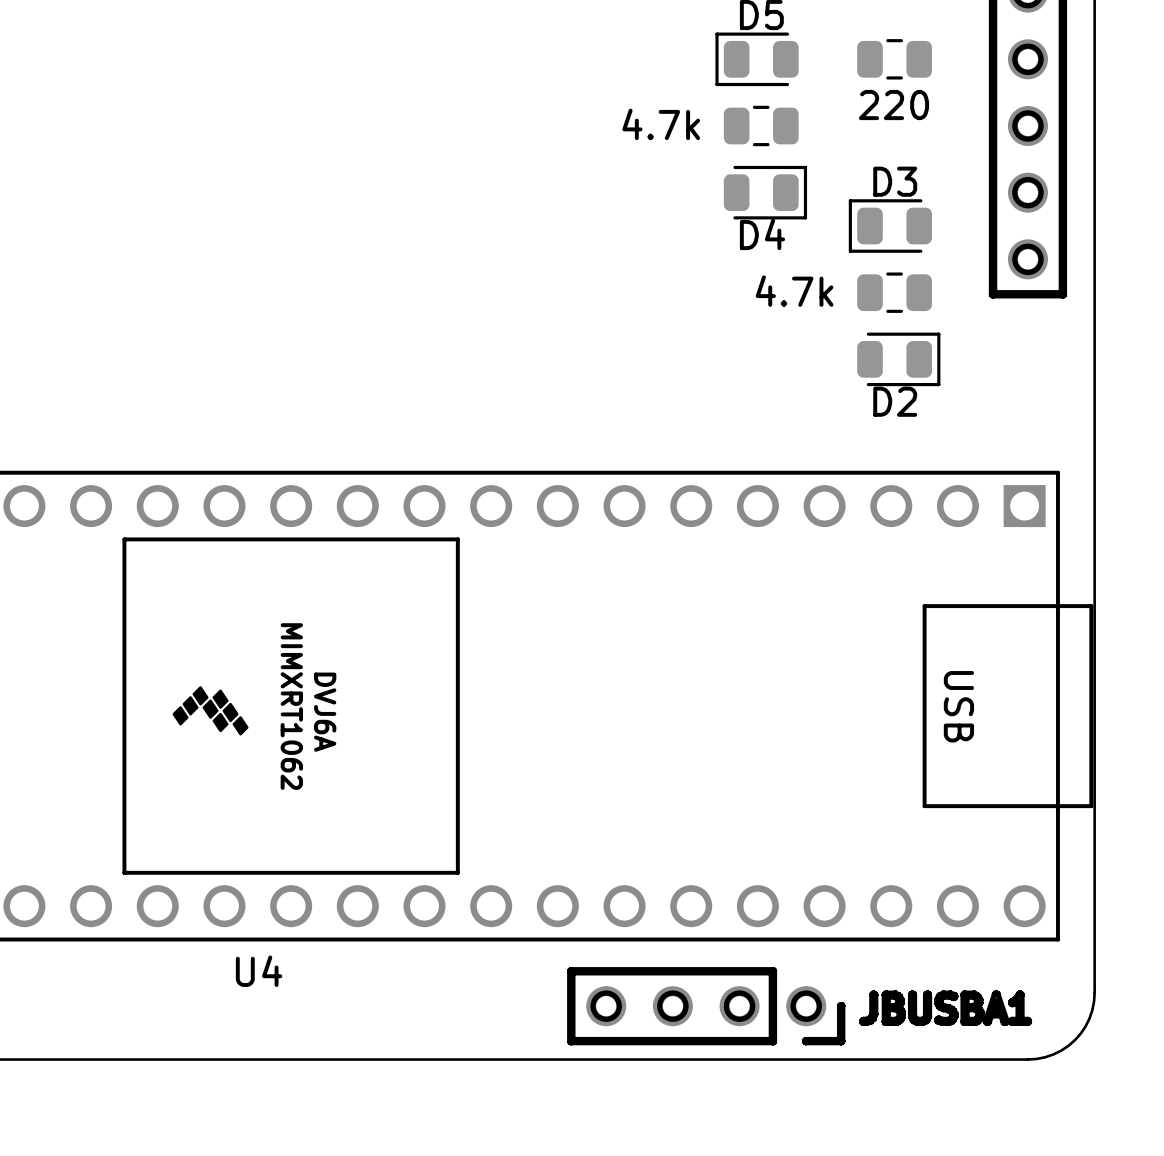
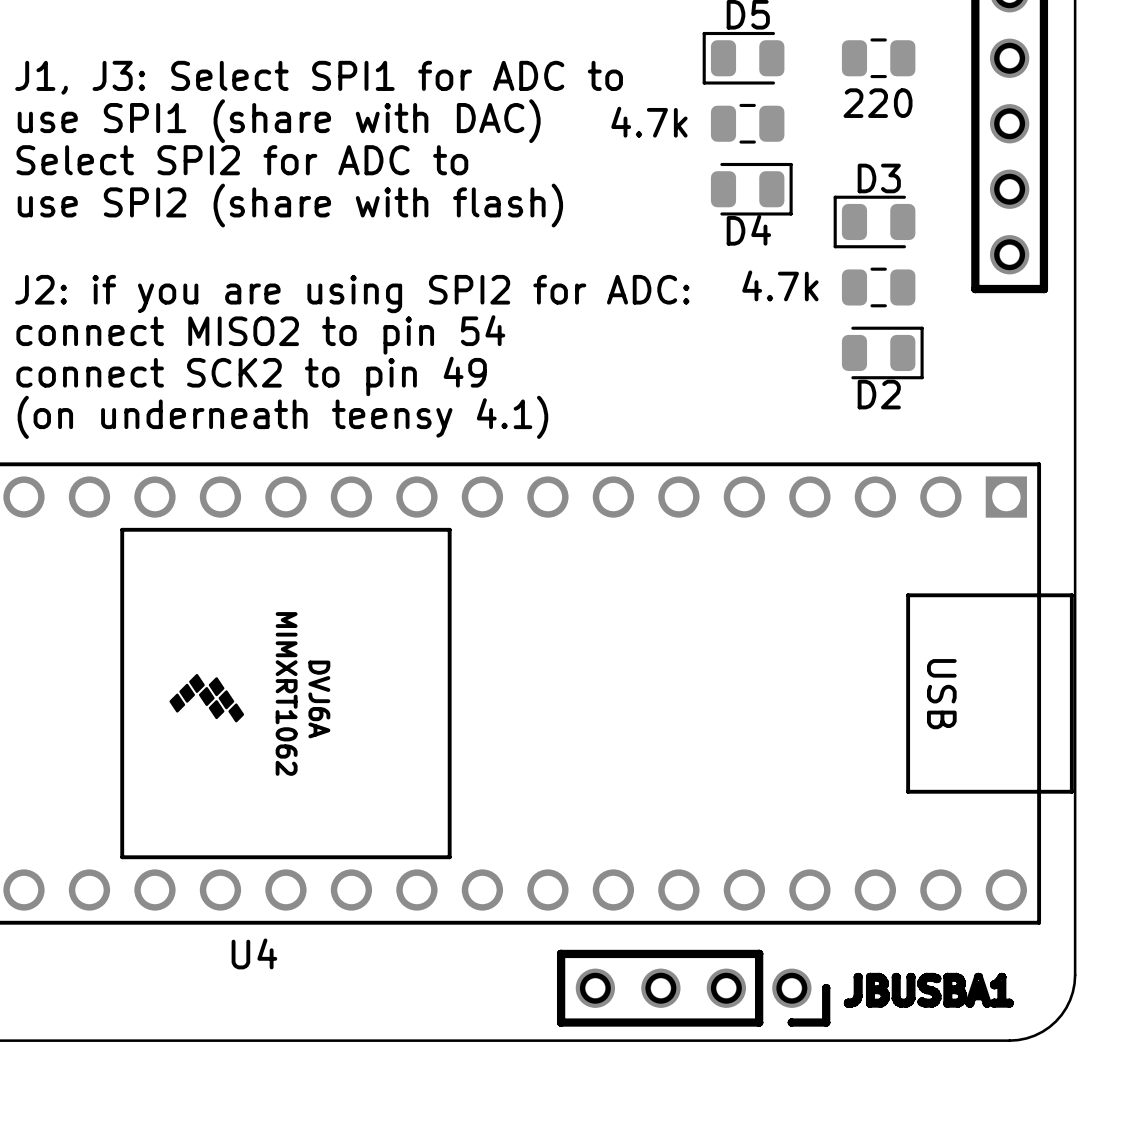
text: none -> J1, J3: Select SPI1 for ADC to (319, 77)
text: none -> use SPI1 (share with DAC) (279, 121)
text: none -> Select SPI2 for ADC to (242, 160)
text: none -> use SPI2 (share with flash) (290, 205)
text: none -> J2: if you are using SPI2 for ADC: (352, 294)
text: none -> connect MISO2 to pin 54 (260, 334)
text: none -> connect SCK2 to pin 49 (251, 376)
text: none -> (on underneath teensy 4.1) (282, 417)

